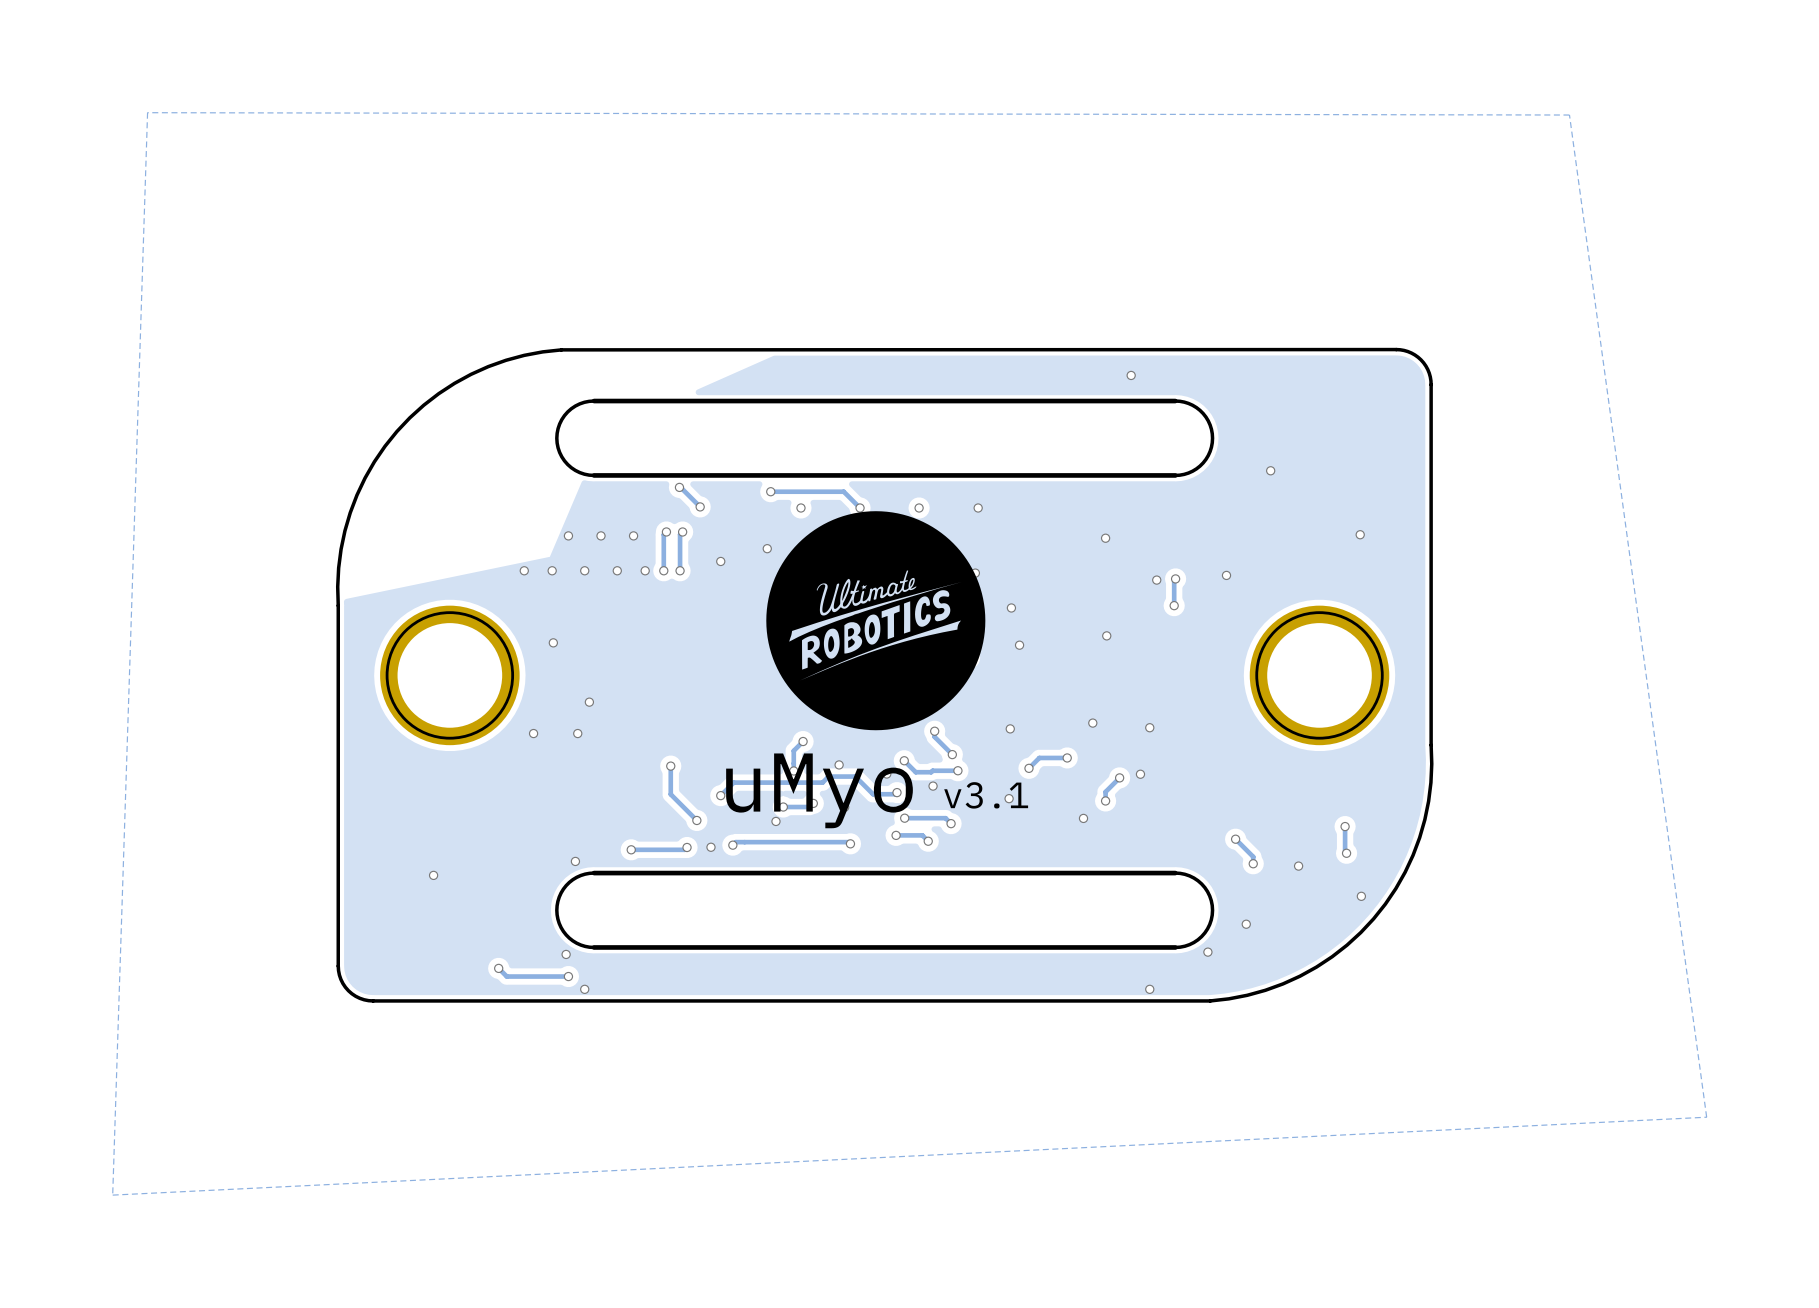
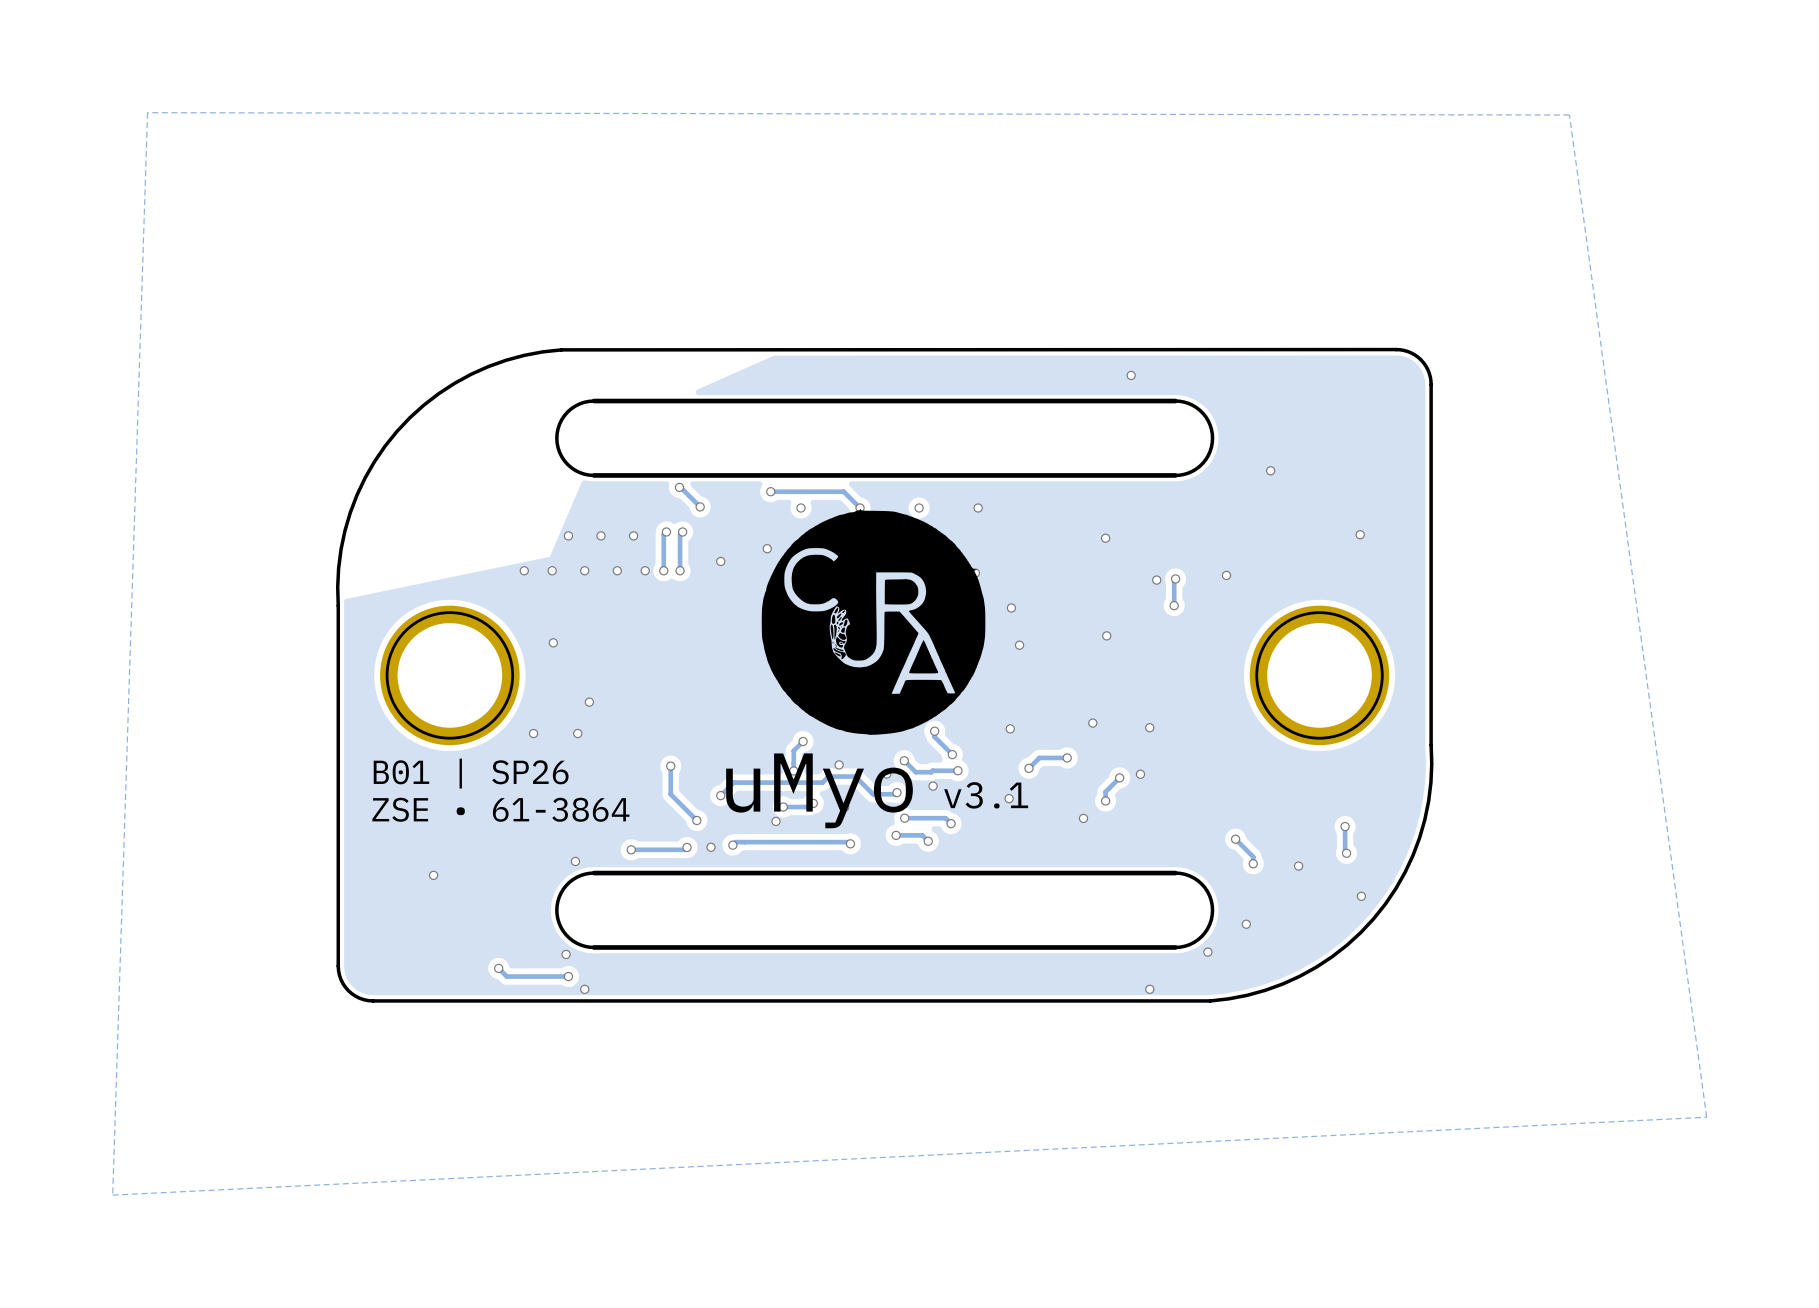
drawing shape: [766, 511, 986, 731] -> [761, 509, 986, 735]
drawing: [889, 579, 914, 595] -> none
drawing: [807, 582, 875, 652] -> none
text: none -> B01 | SP26 (471, 773)
text: none -> ZSE • 61-3864 (500, 809)

